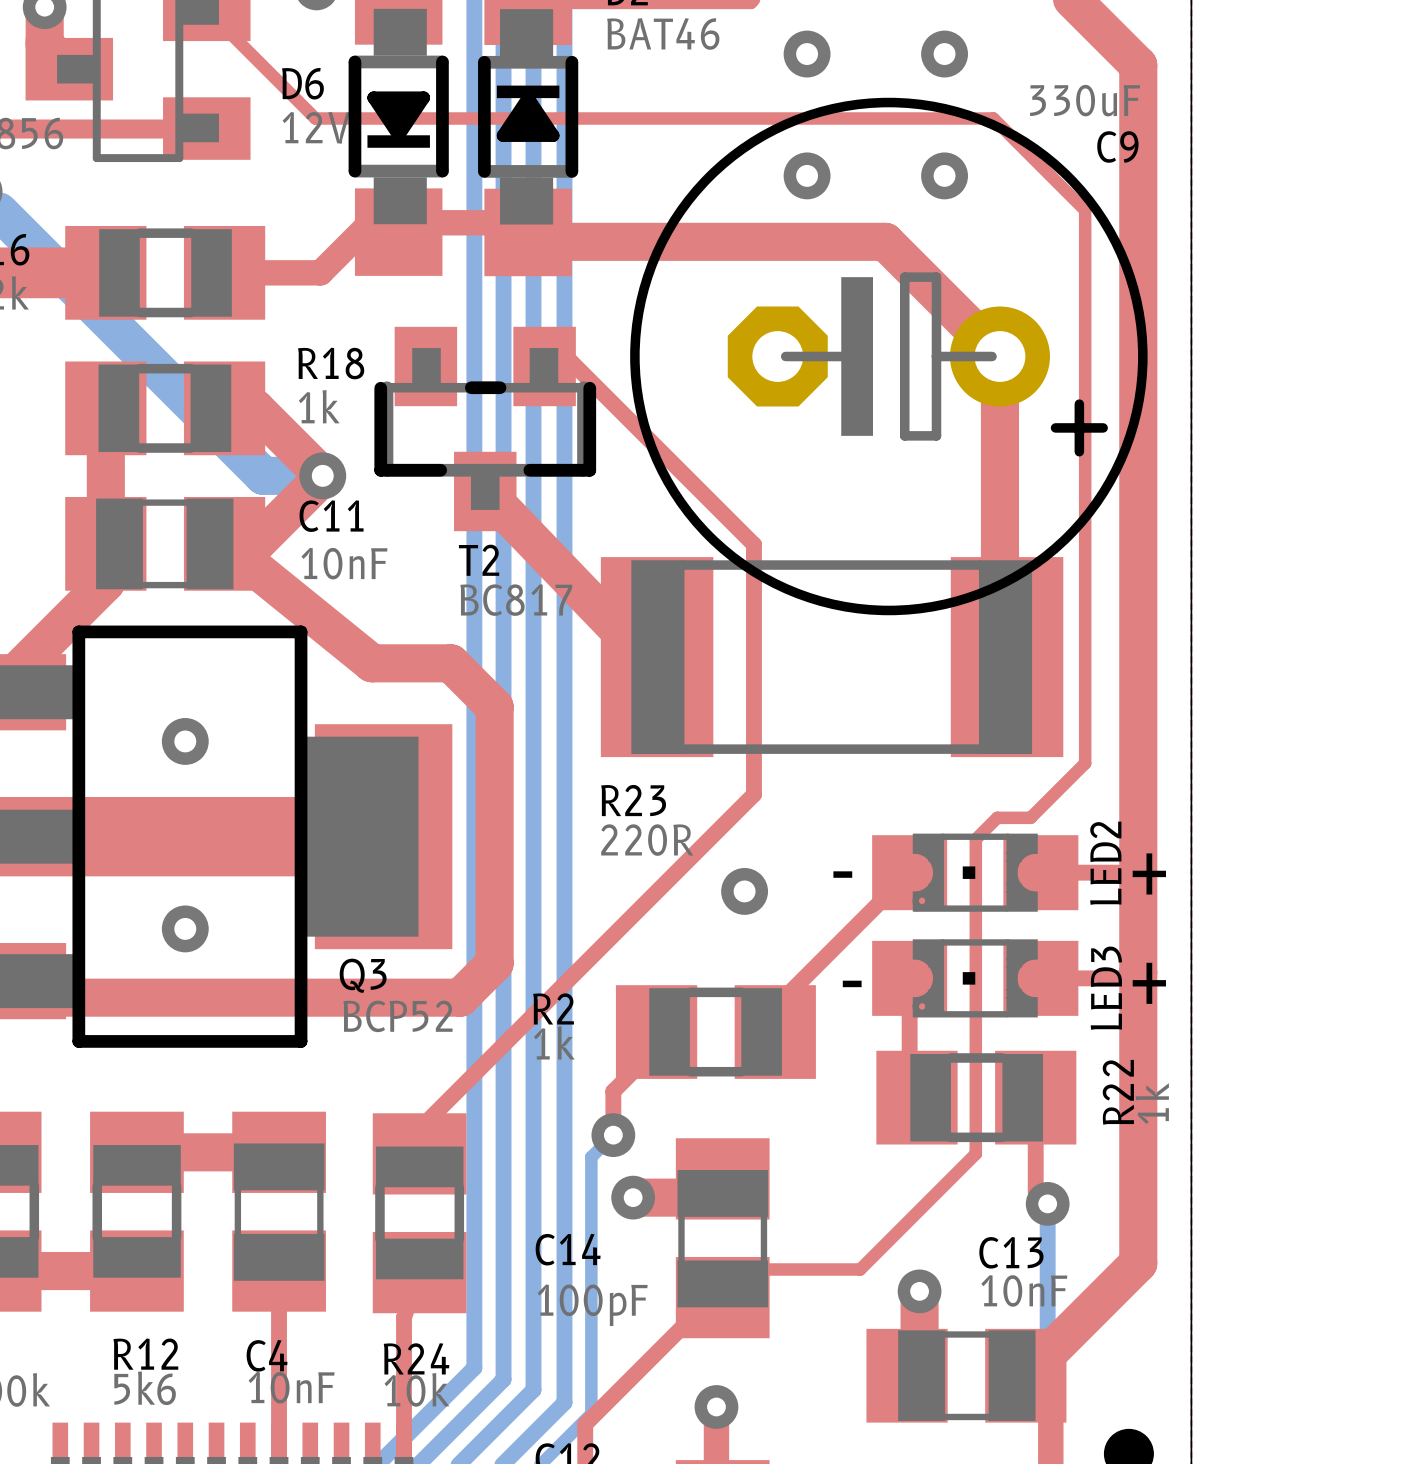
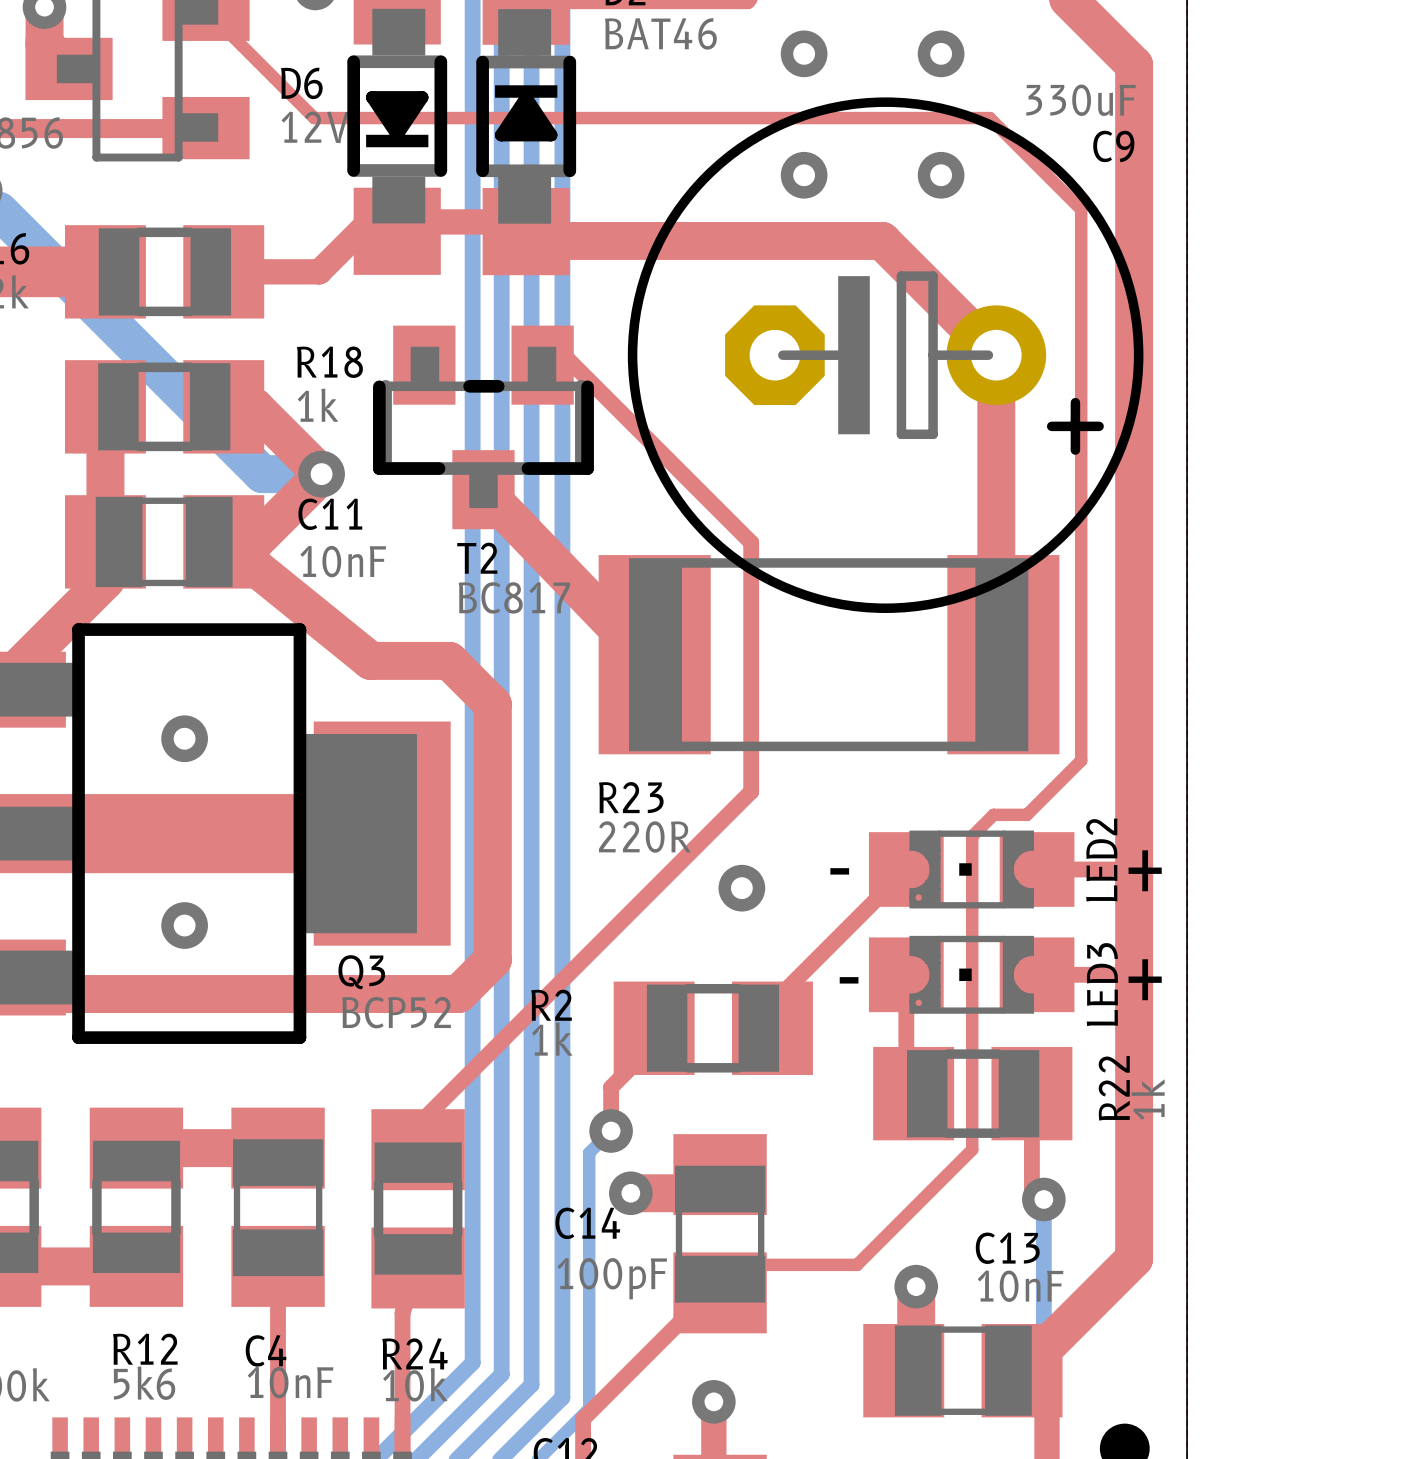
C14 name position: C14 (568, 1249) -> C14 (587, 1223)
C14 value position: 100pF (592, 1305) -> 100pF (612, 1278)

